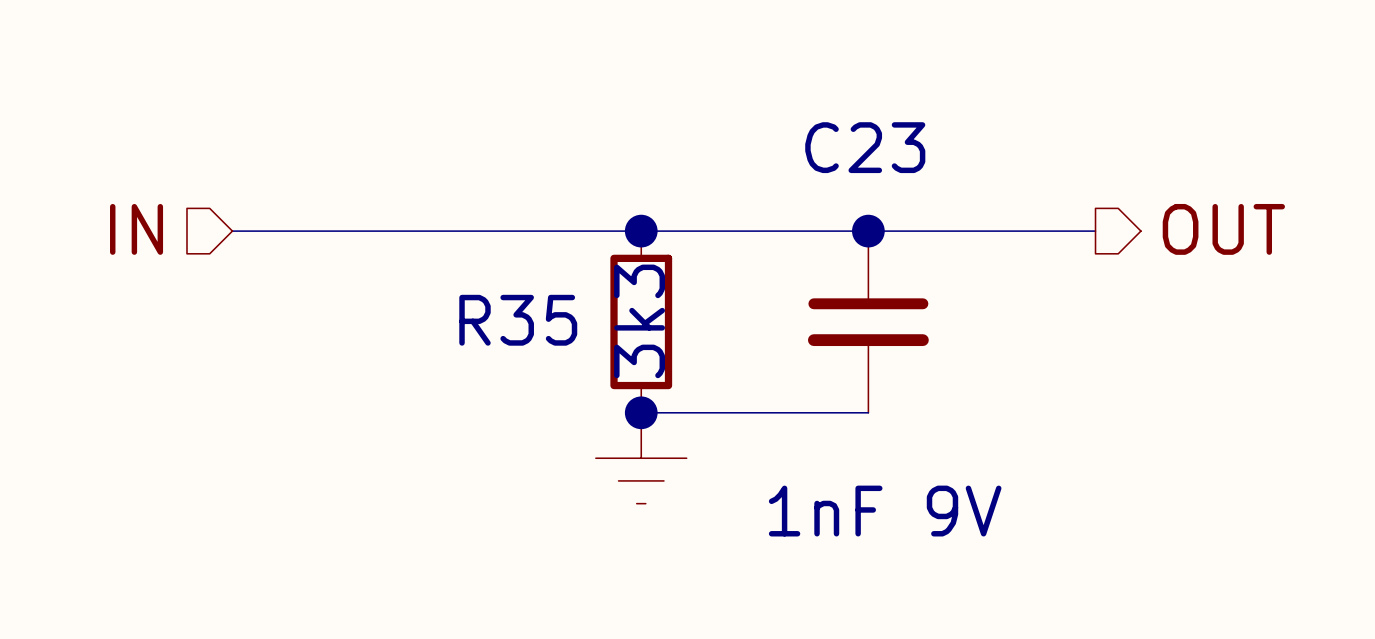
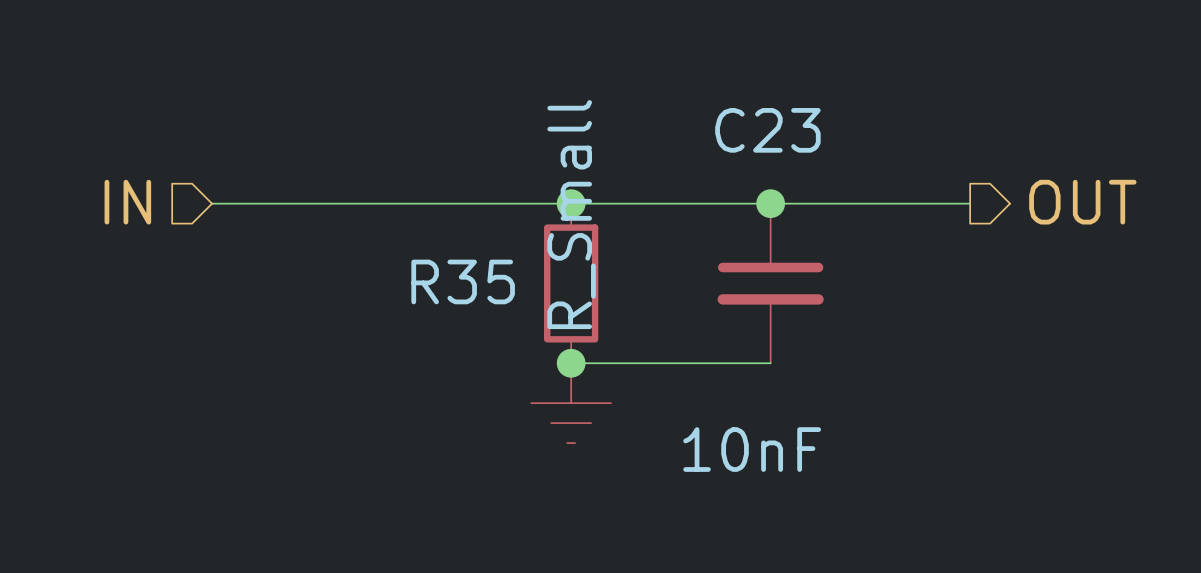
R35 value: 3k3 (639, 321) -> R_Small (571, 214)
C23 value: 1nF 9V (885, 511) -> 10nF (752, 449)

